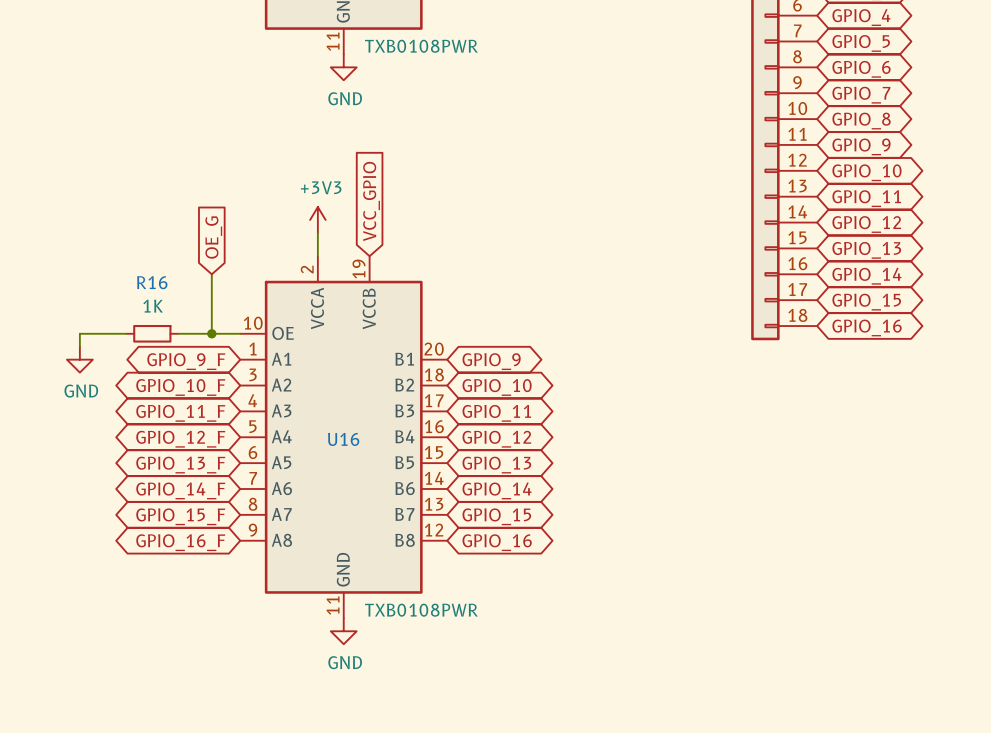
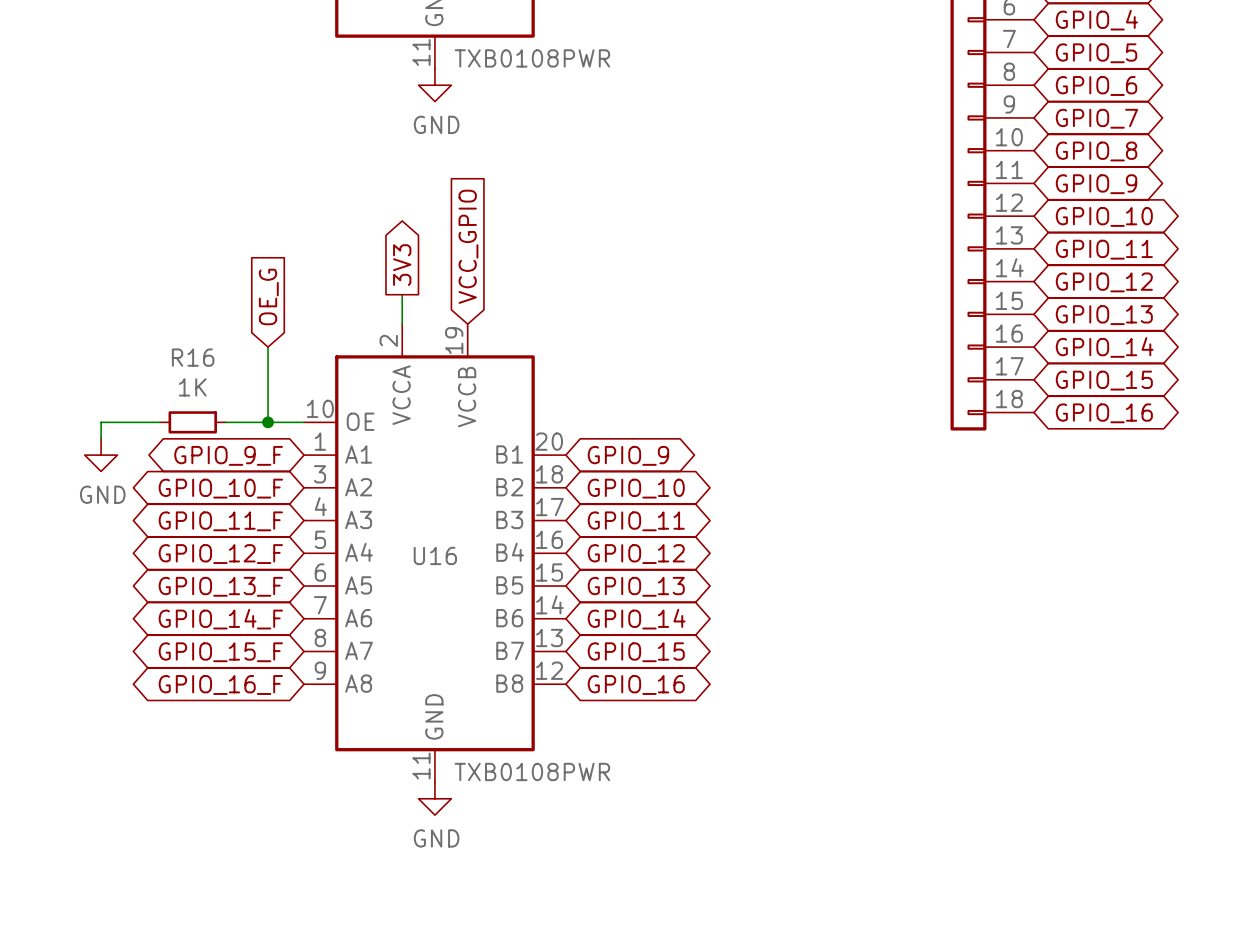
global label: none -> 3V3 (402, 265)
power symbol: +3V3 (317, 219) -> none

